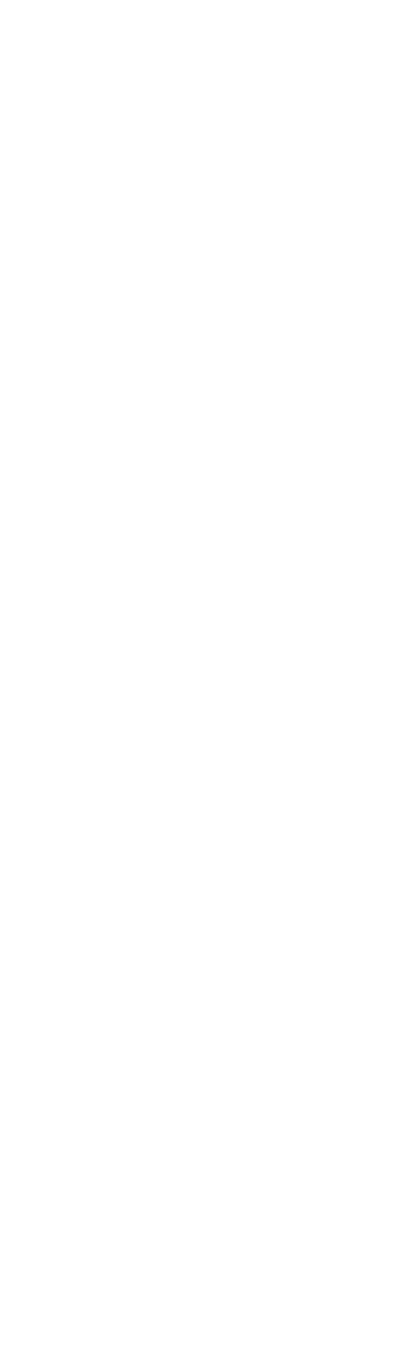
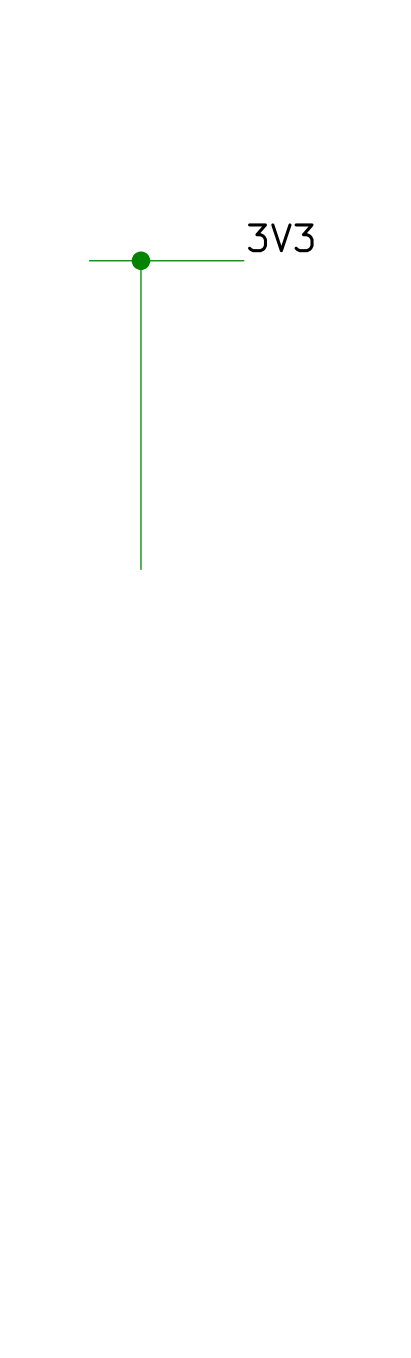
label: none -> 3V3 (280, 237)
wire: none -> (89, 260) (243, 260)
wire: none -> (140, 260) (140, 569)
junction: none -> (140, 260)

